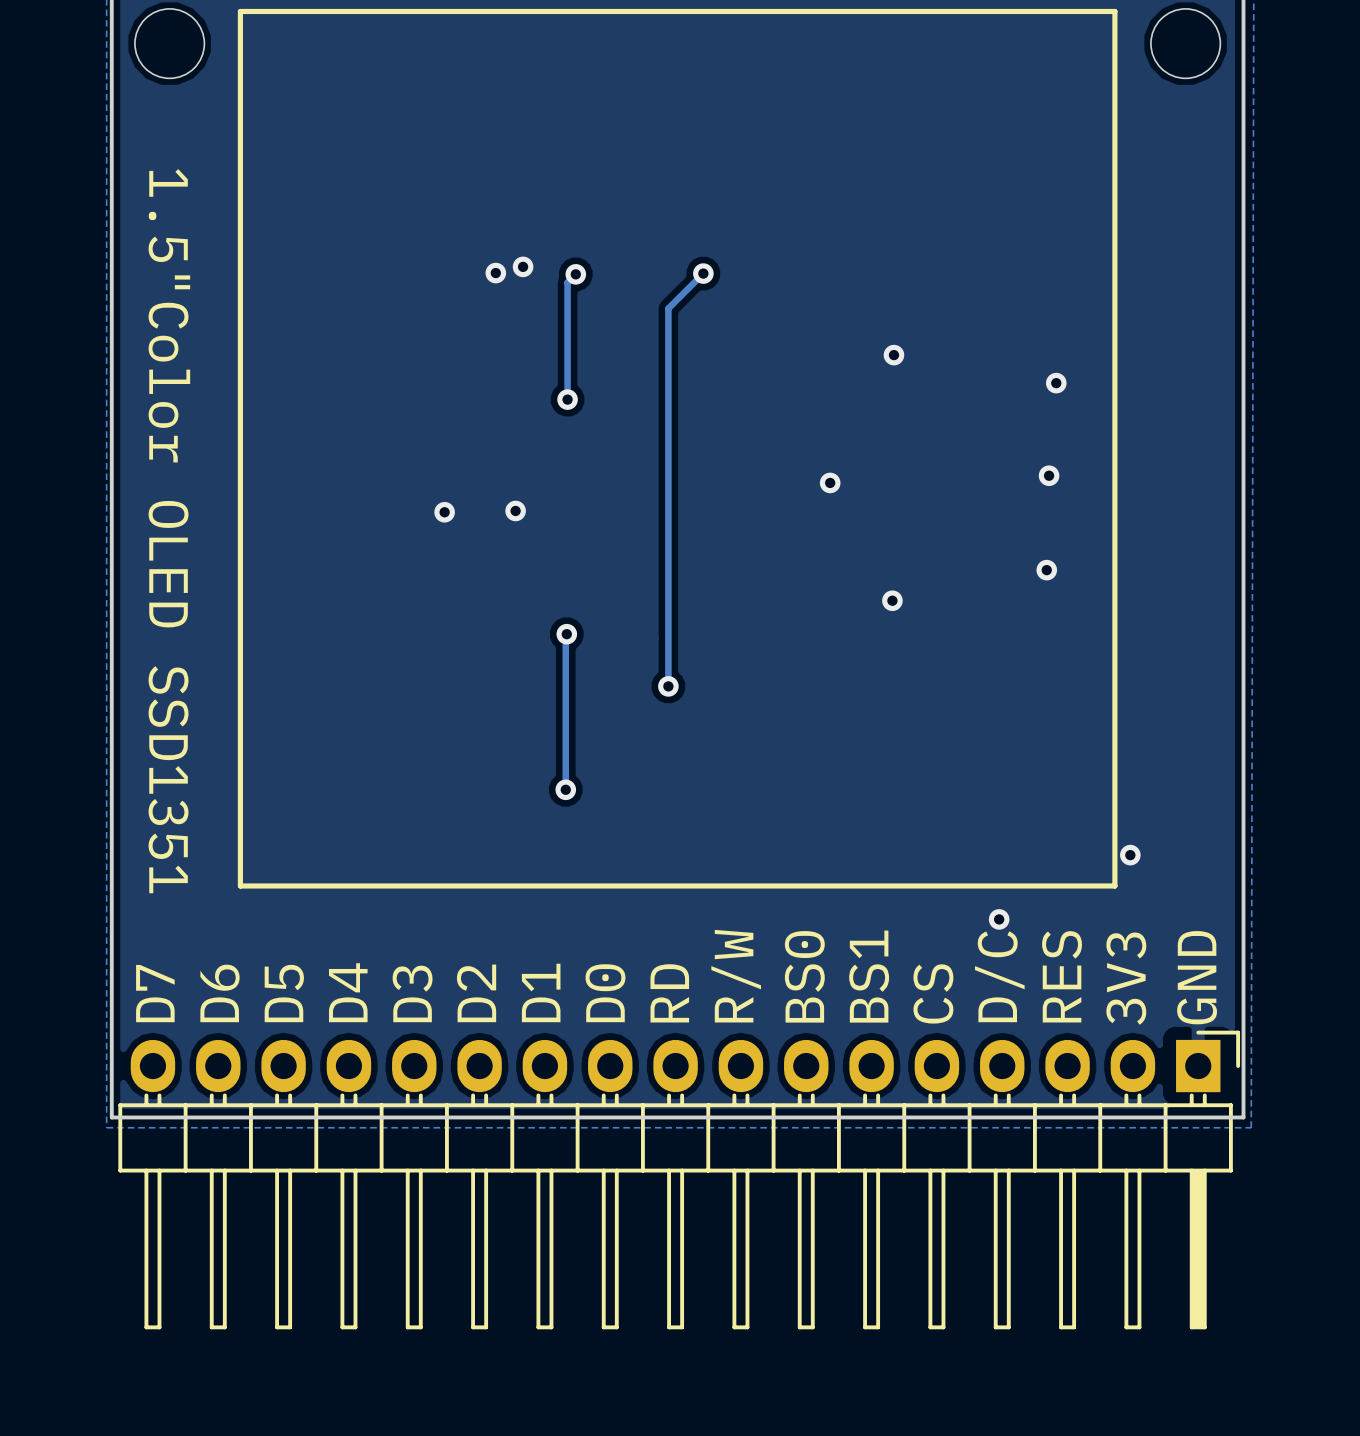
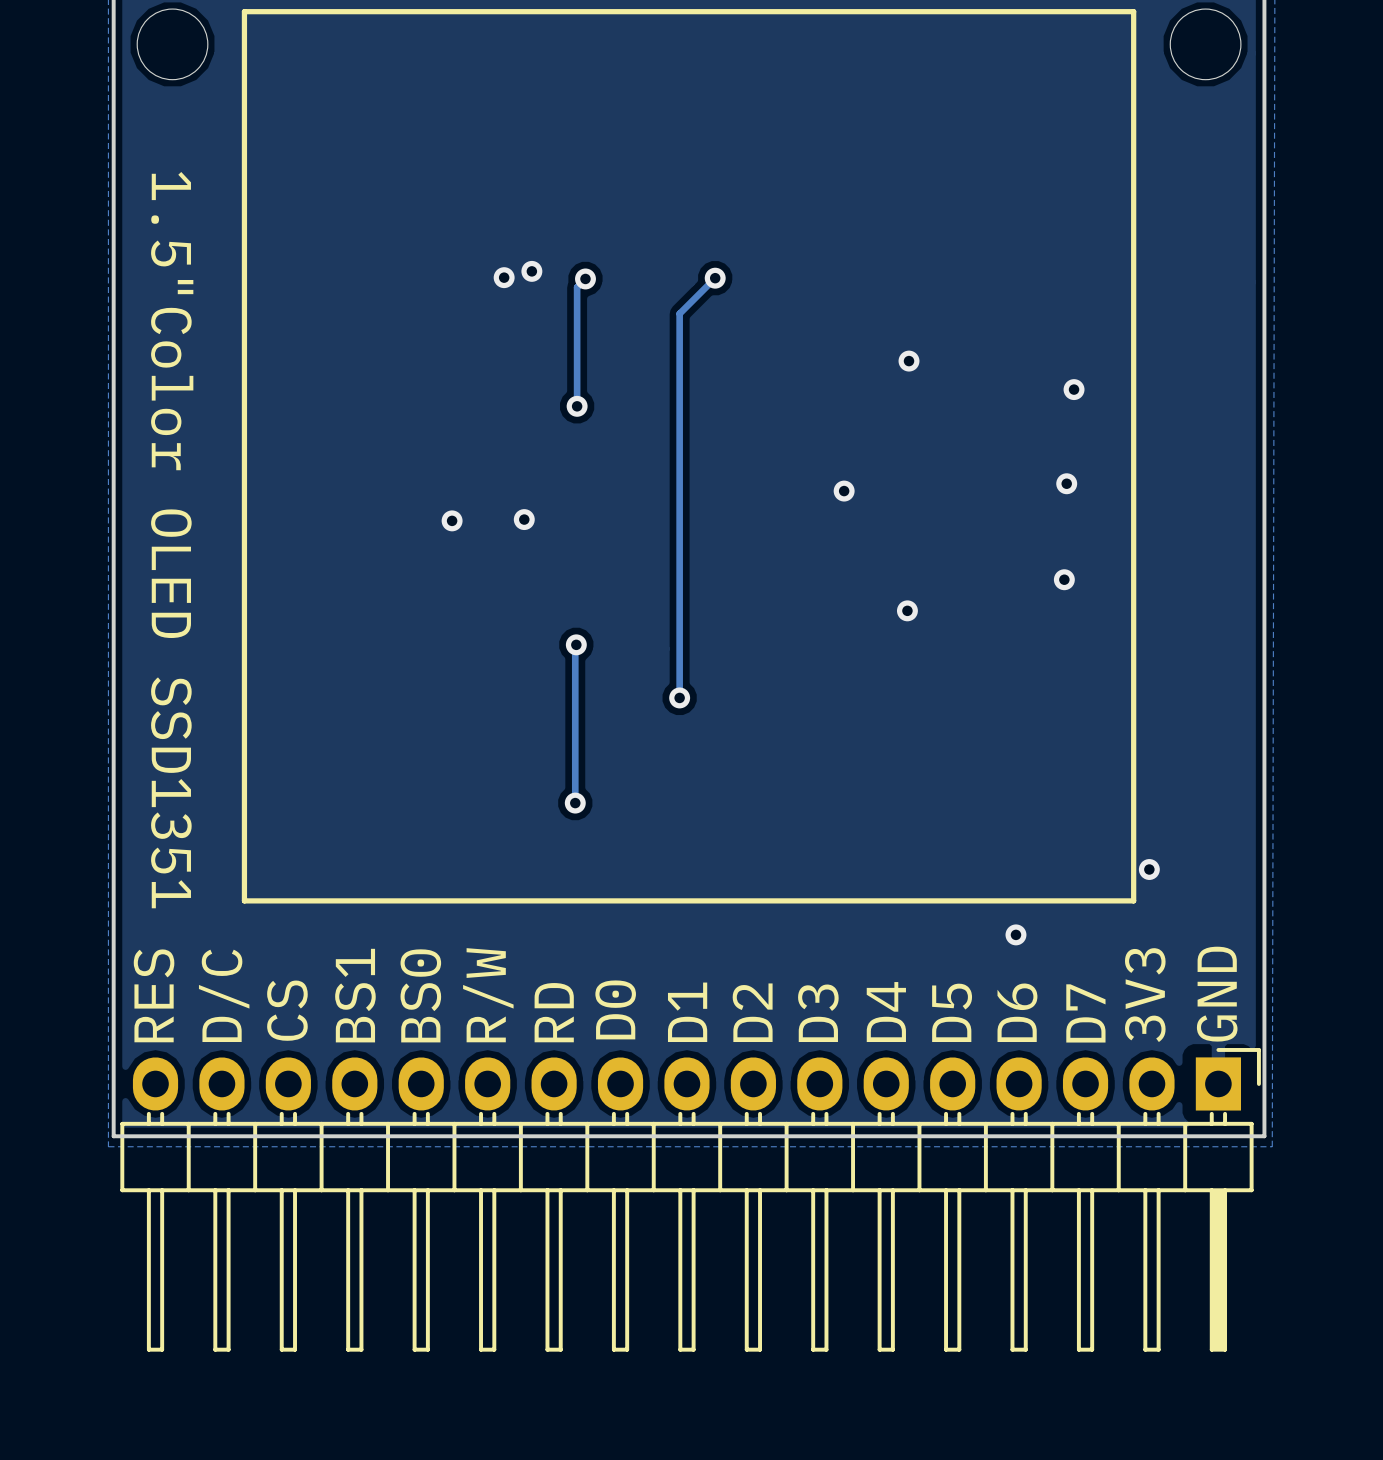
text position: R/W (736, 976) -> R/W (488, 995)
text: BS0 (804, 976) -> D3 (818, 1013)
text position: BS1 (869, 976) -> BS1 (355, 995)
text: D/C (999, 976) -> D6 (1017, 1012)
text: RES (1062, 976) -> D7 (1085, 1013)
text position: D4 (348, 992) -> D4 (886, 1012)
text position: D1 (541, 992) -> D1 (687, 1012)
text: D7 (155, 993) -> RES (154, 995)
text: D6 (220, 993) -> D/C (224, 995)
text: D5 (284, 993) -> CS (287, 1010)
text: D3 (412, 993) -> BS0 (420, 995)
text position: D2 (476, 993) -> D2 (752, 1012)
text position: RD (669, 993) -> RD (554, 1012)
text: CS (933, 993) -> D5 (952, 1012)

